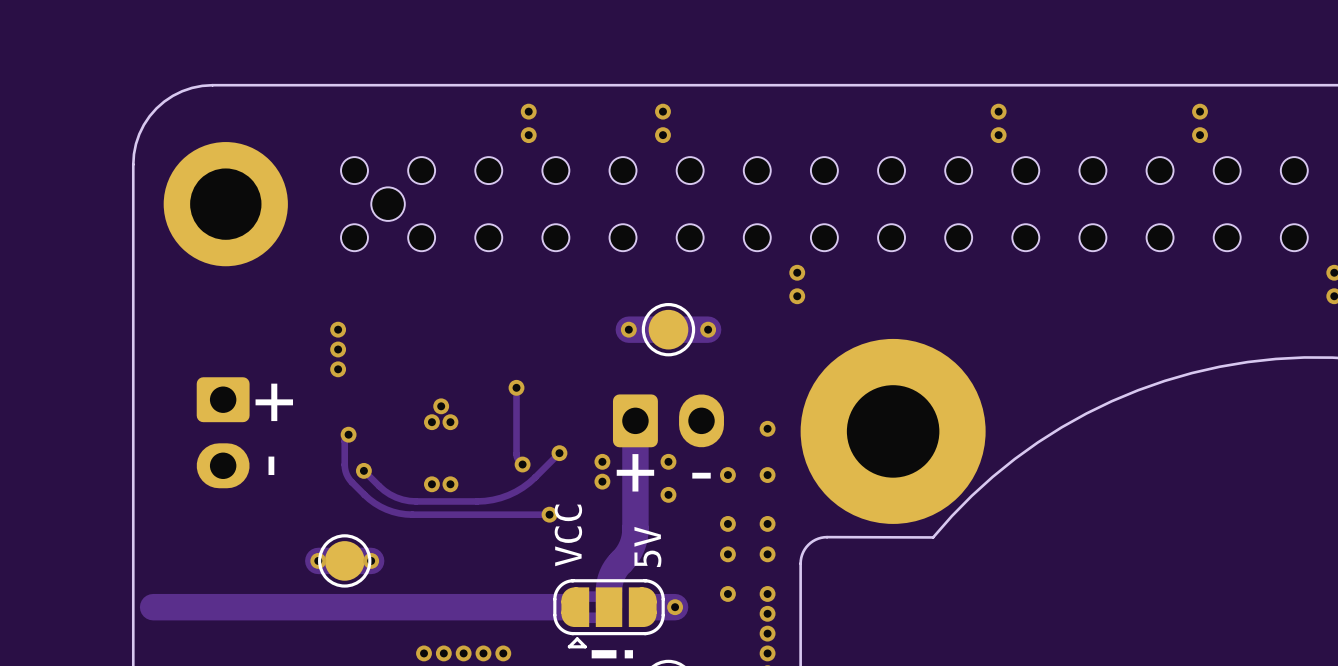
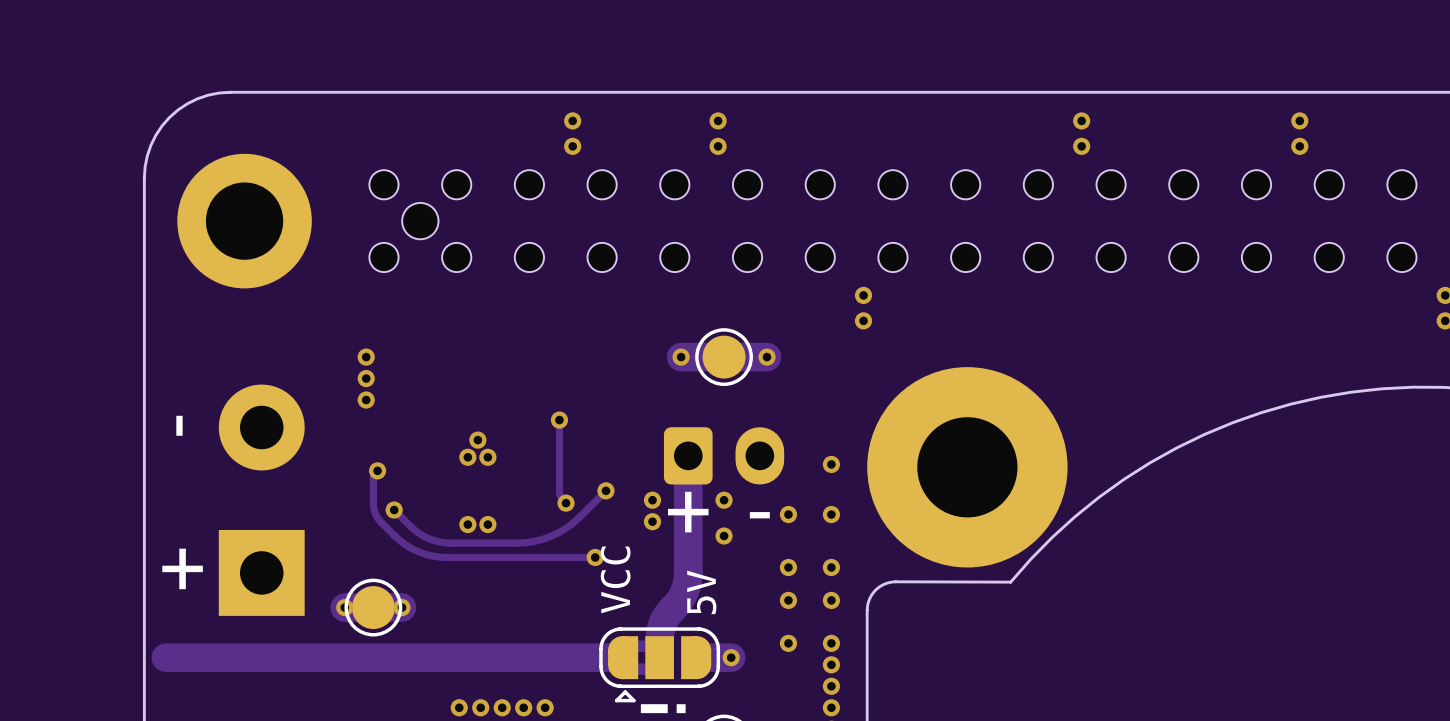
text position: + (274, 402) -> + (182, 568)
part: (223, 432) -> none
part: none -> (261, 500)
text position: - (271, 465) -> - (179, 425)

